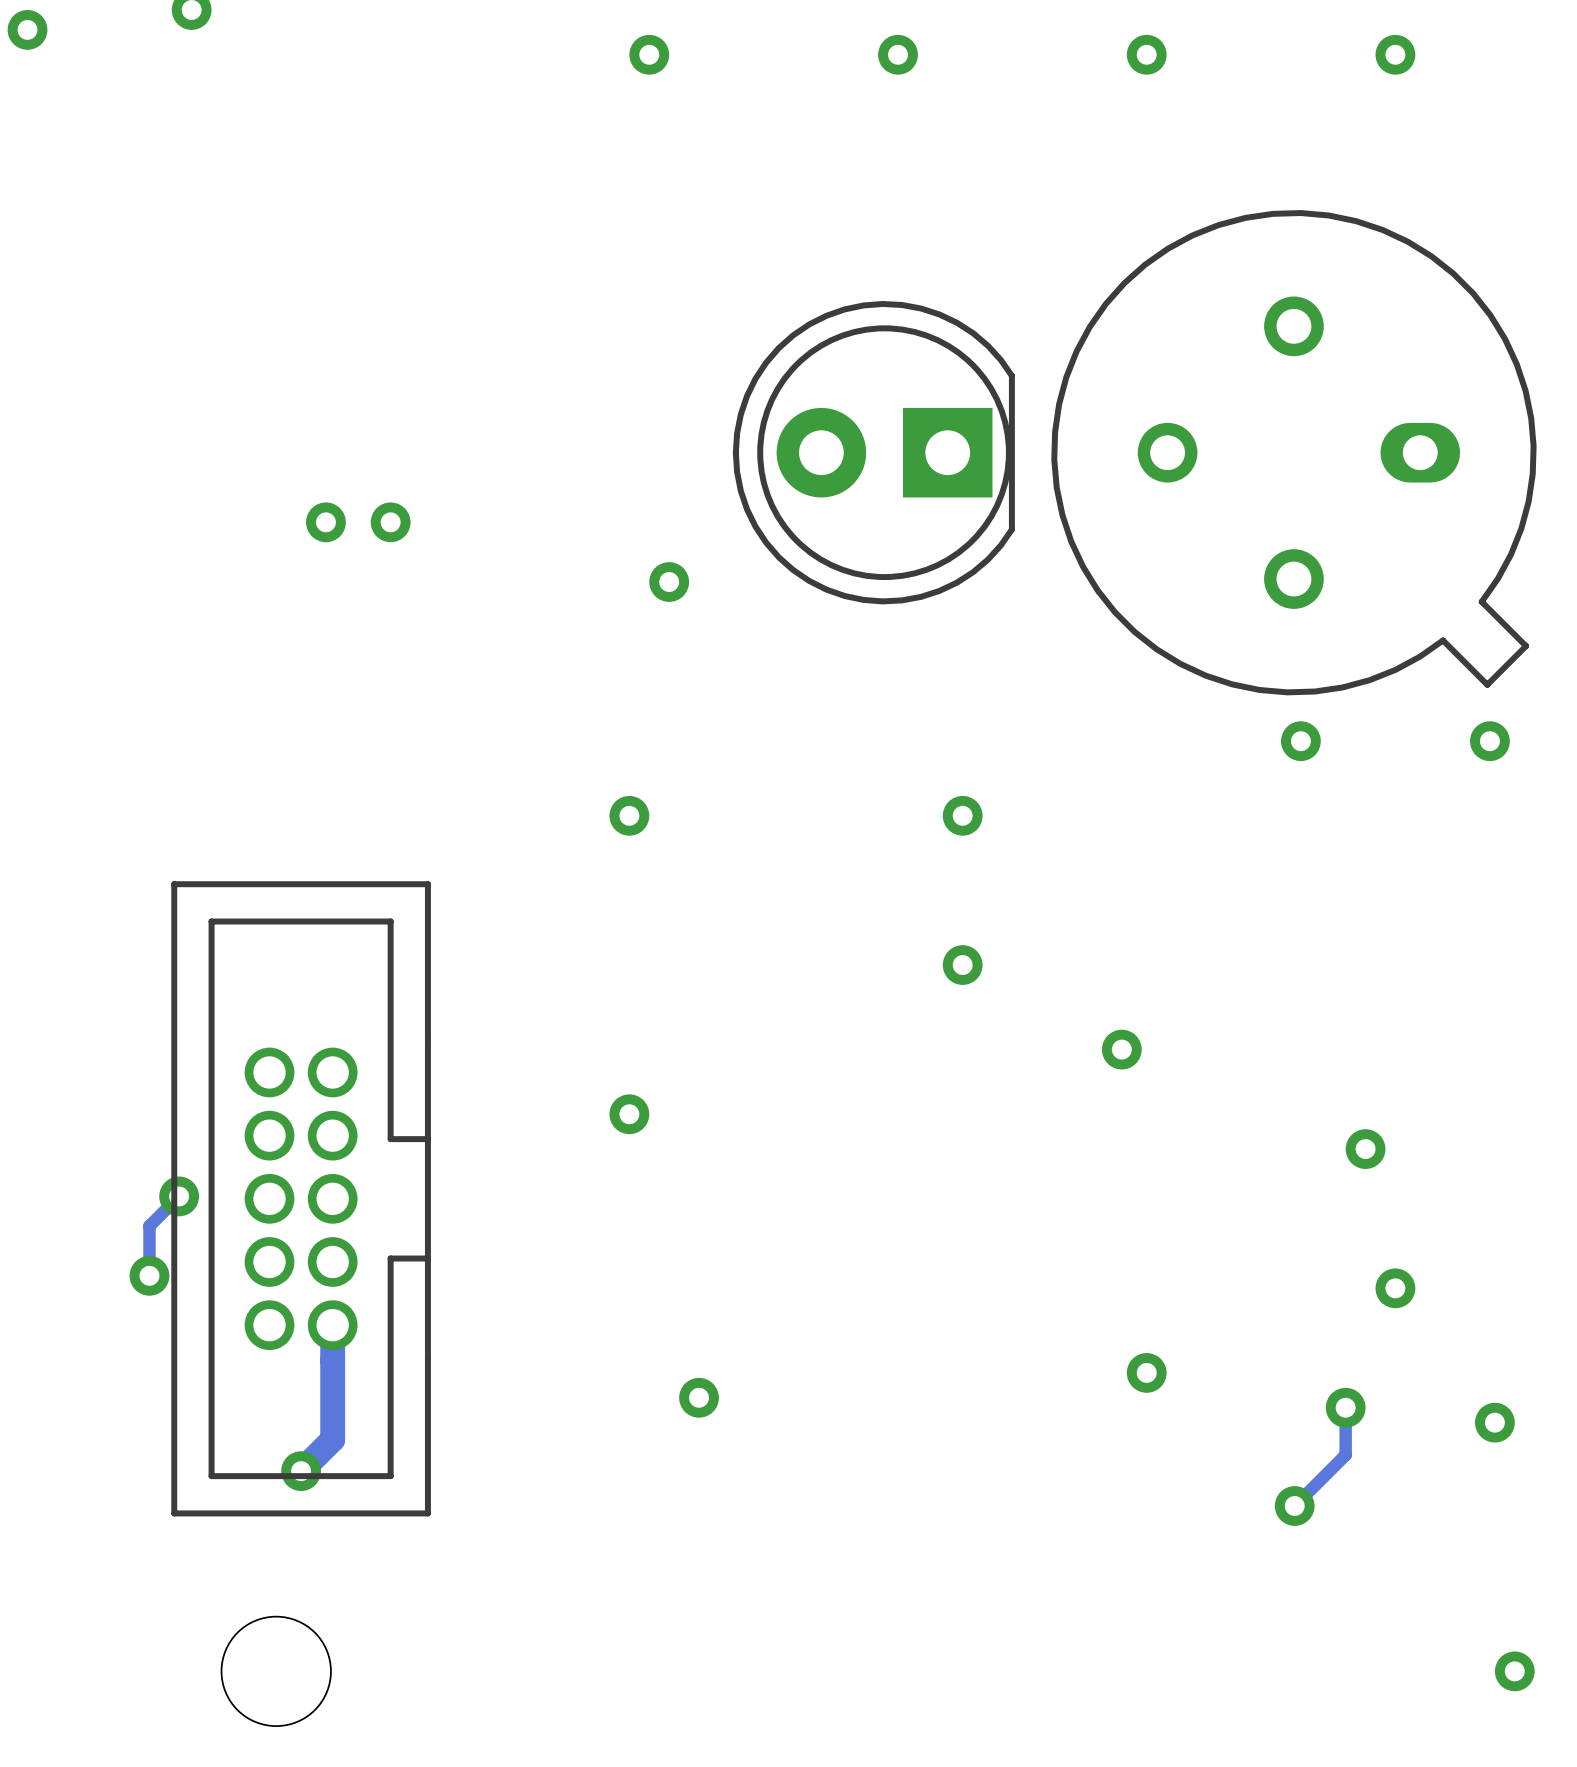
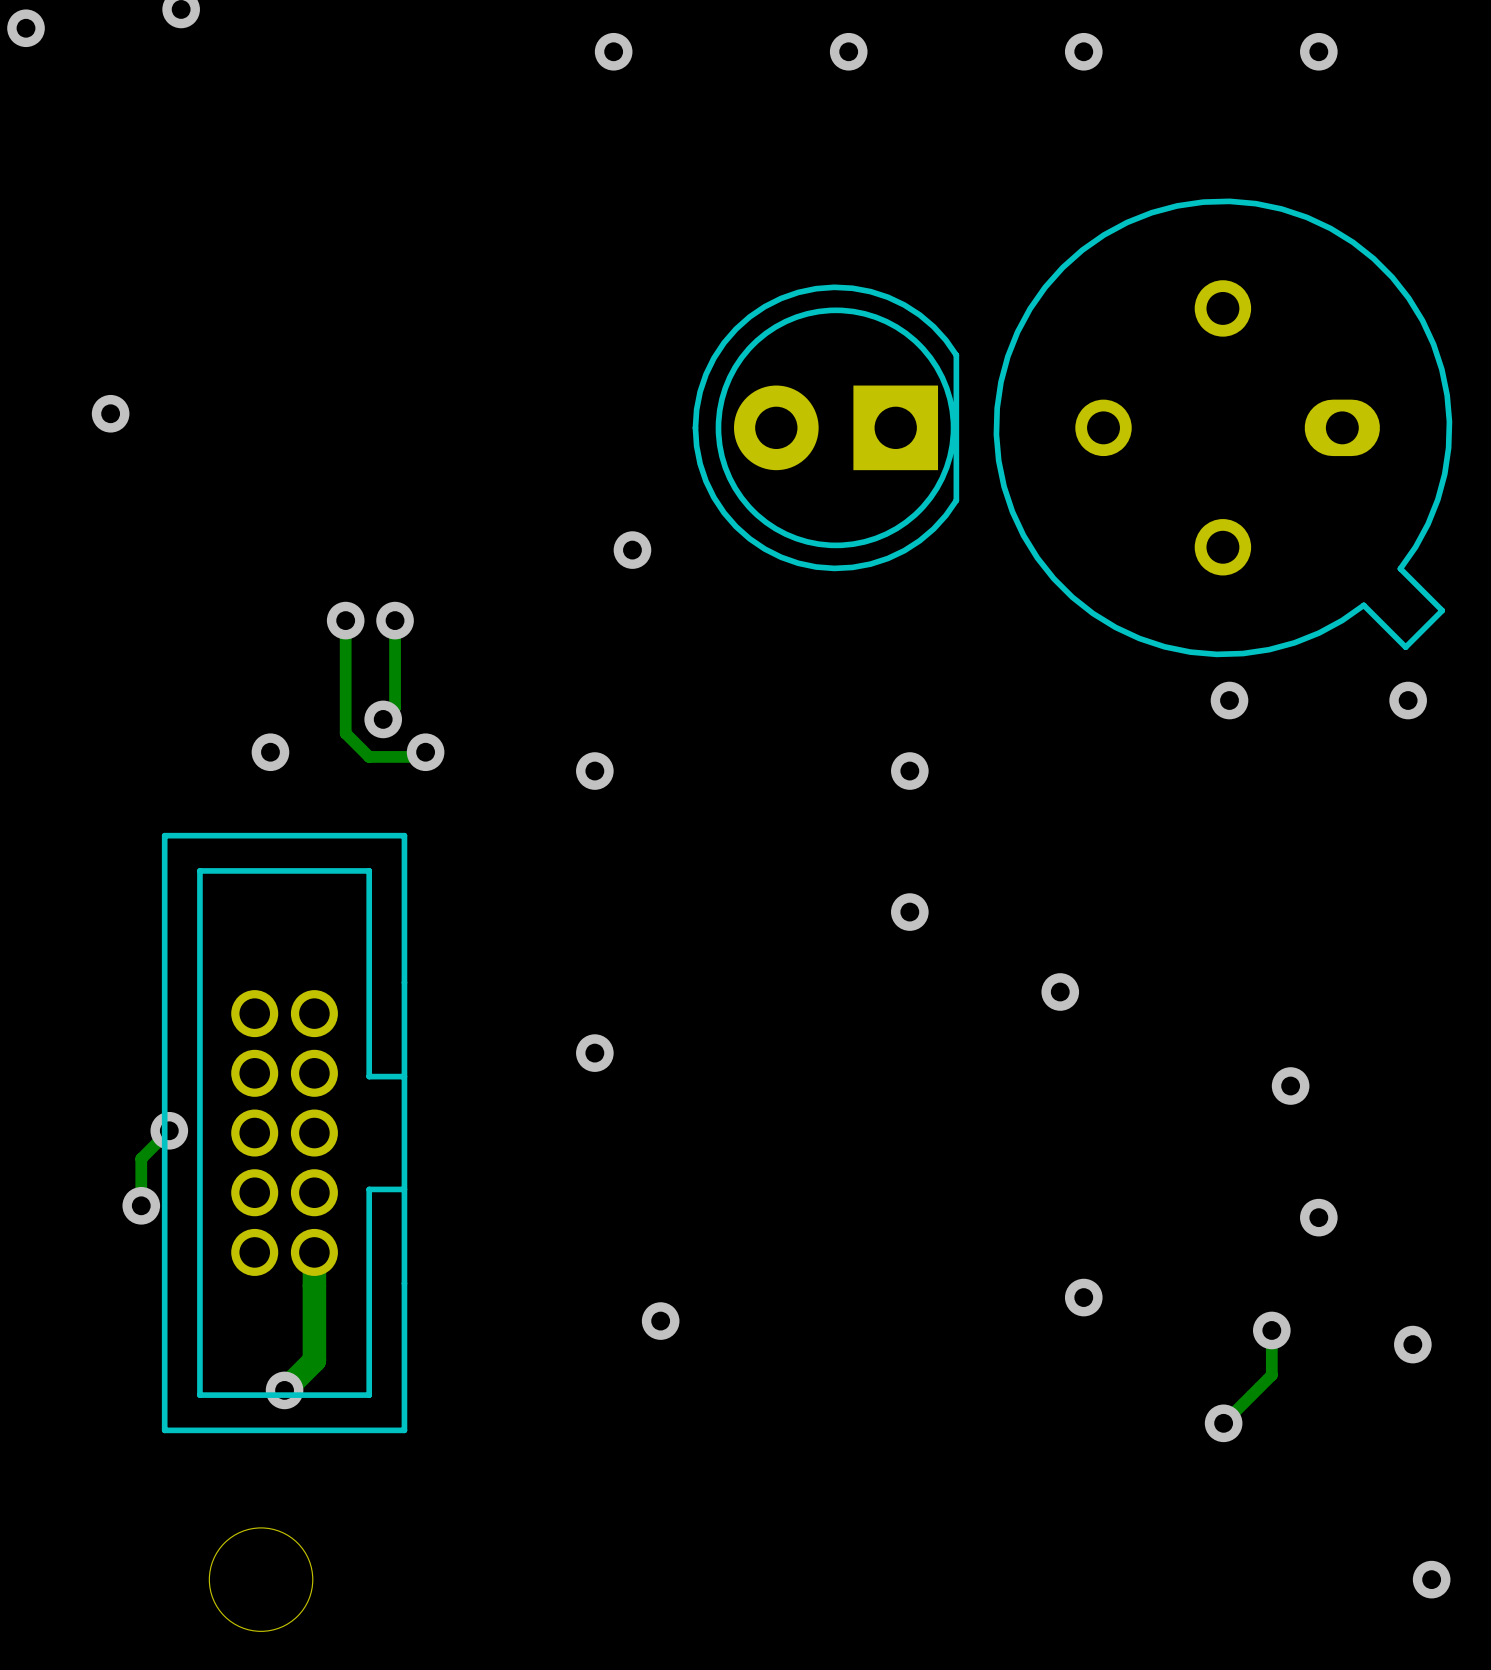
via: none -> (110, 413)
via: (325, 522) -> none
via: (390, 522) -> none
track: none -> (345, 620) (345, 733) (369, 756) (420, 756) (425, 752)
via: none -> (345, 620)
track: none -> (395, 620) (395, 707) (383, 719)
via: none -> (395, 620)
via: none -> (383, 719)
via: none -> (270, 752)
via: none -> (425, 752)

